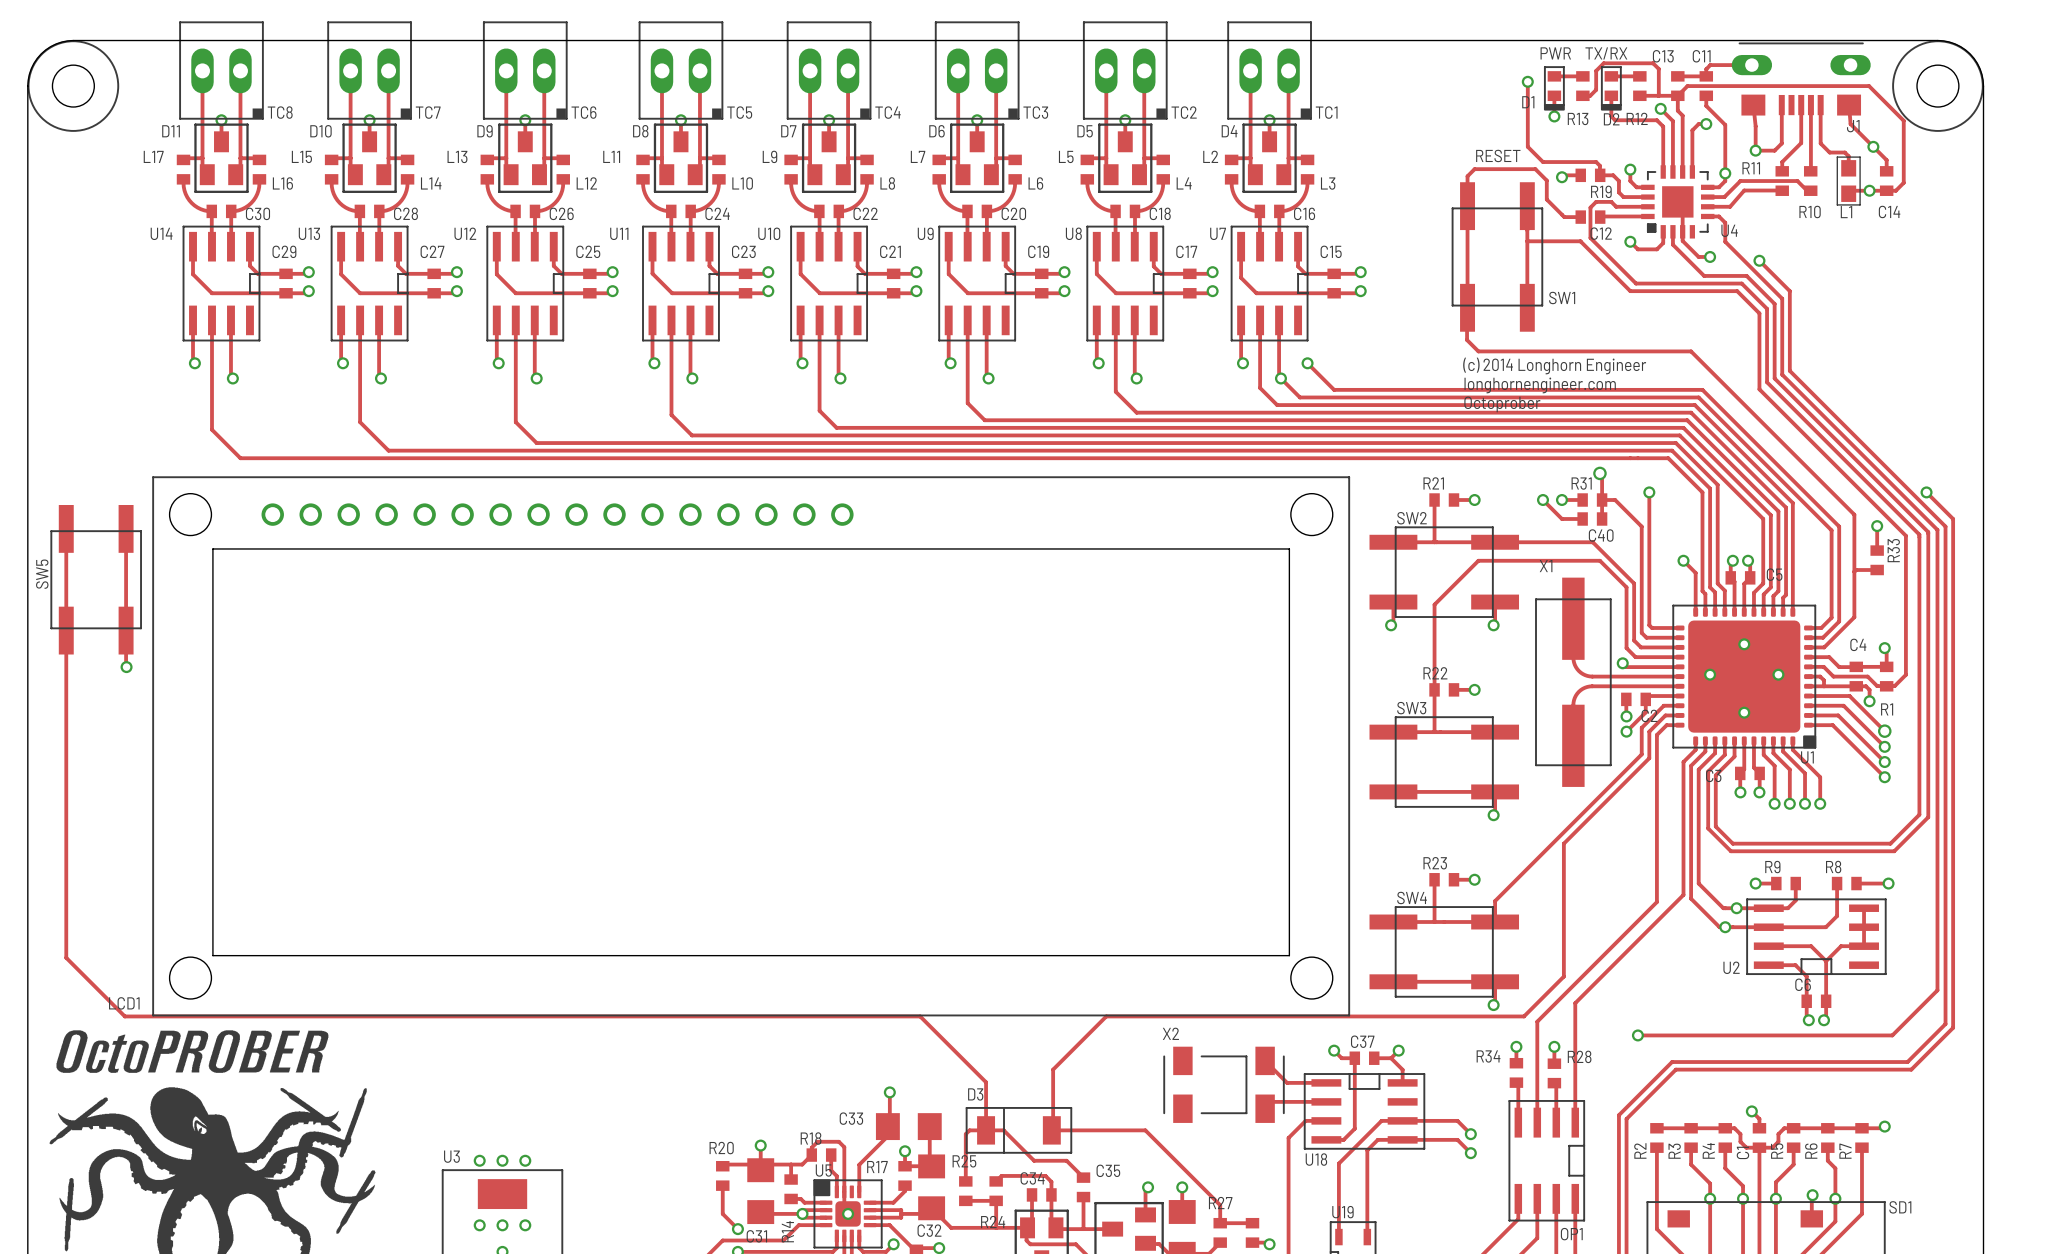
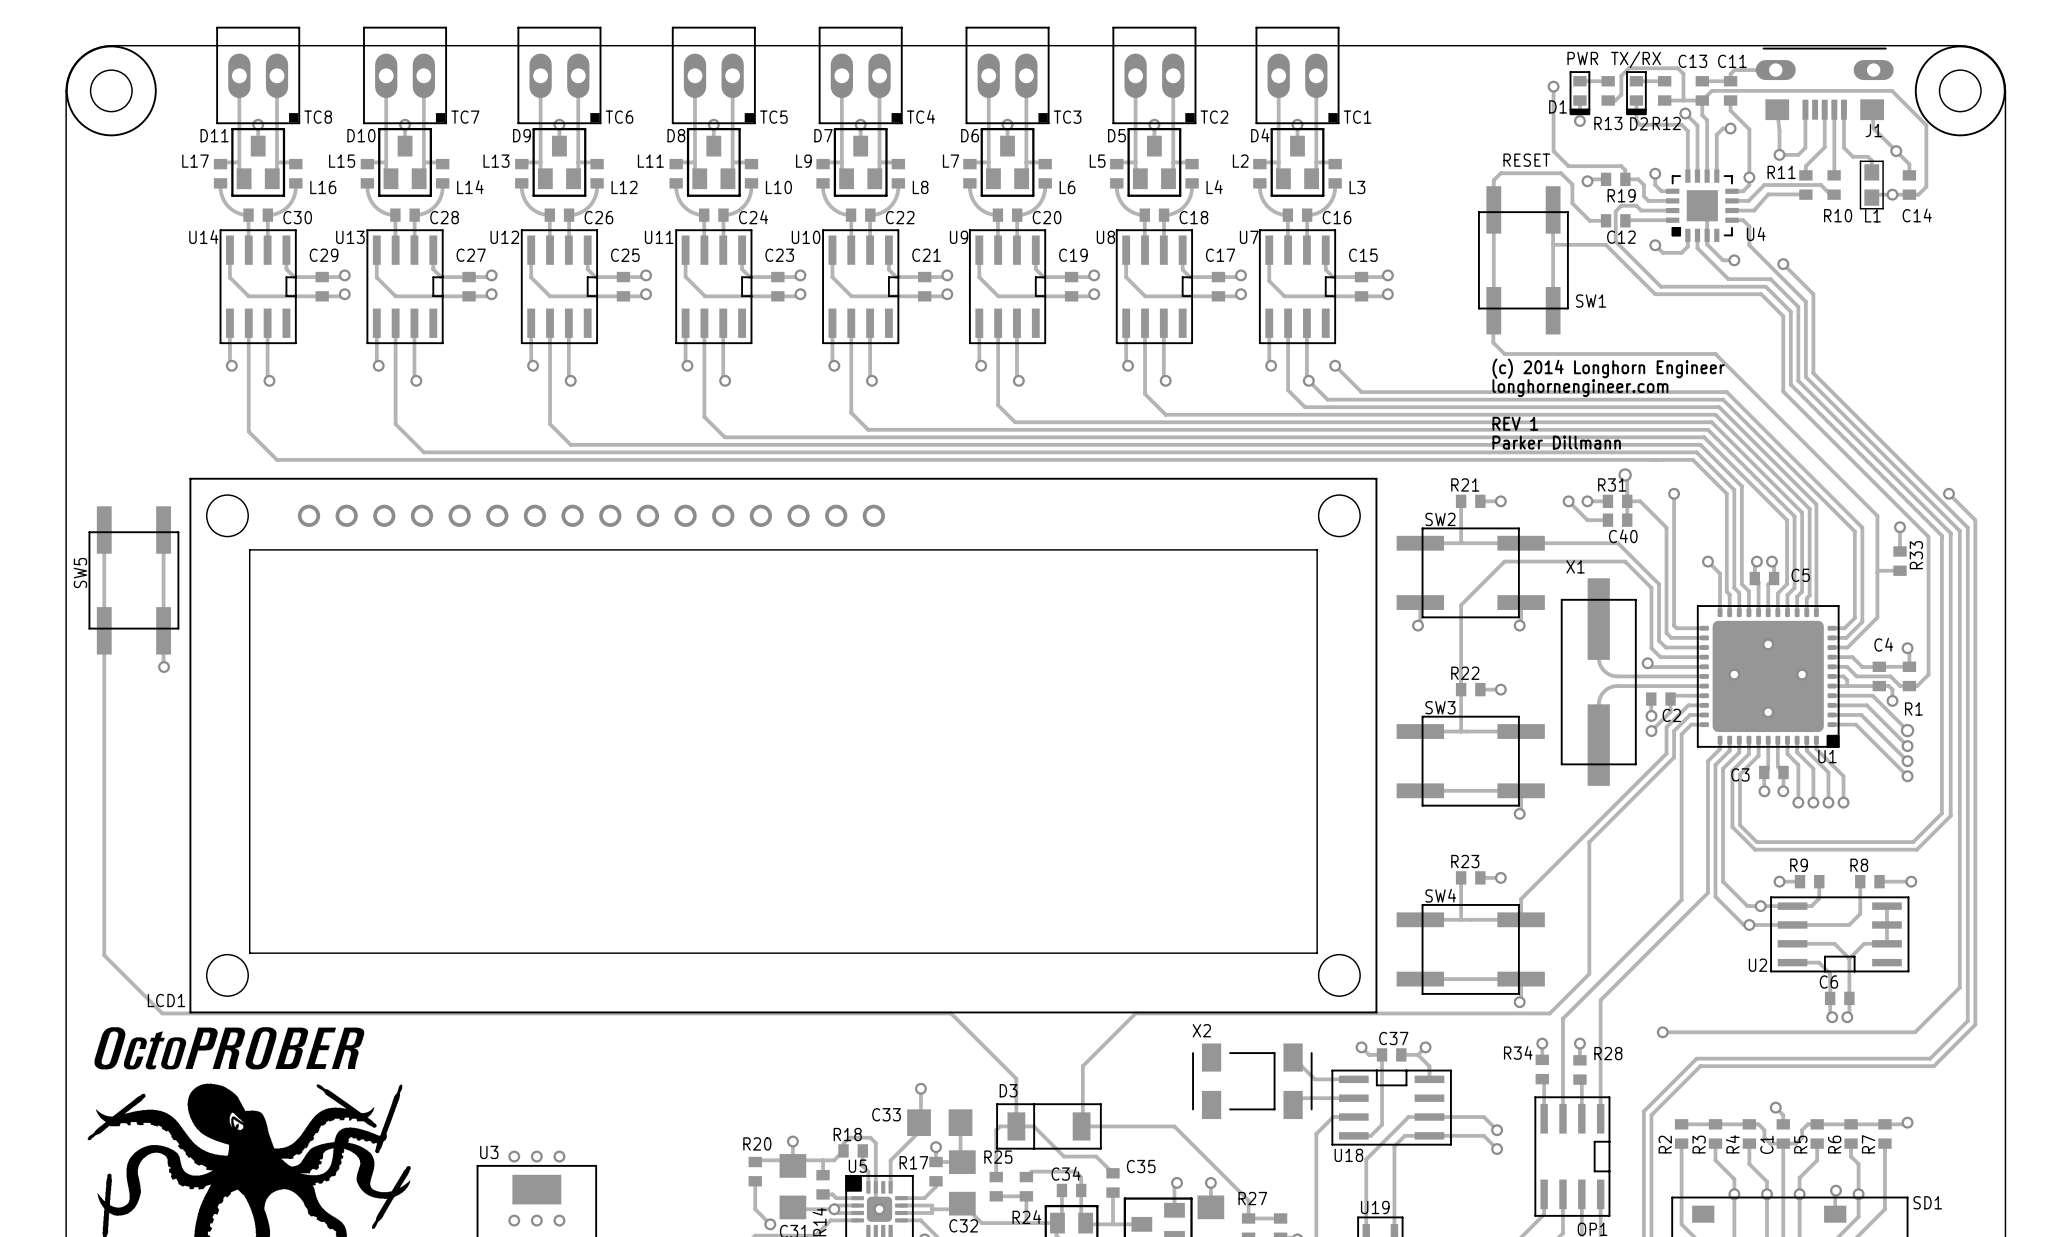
drawing: [1463, 357, 1647, 413] -> none
drawing: none -> [1492, 358, 1725, 450]

